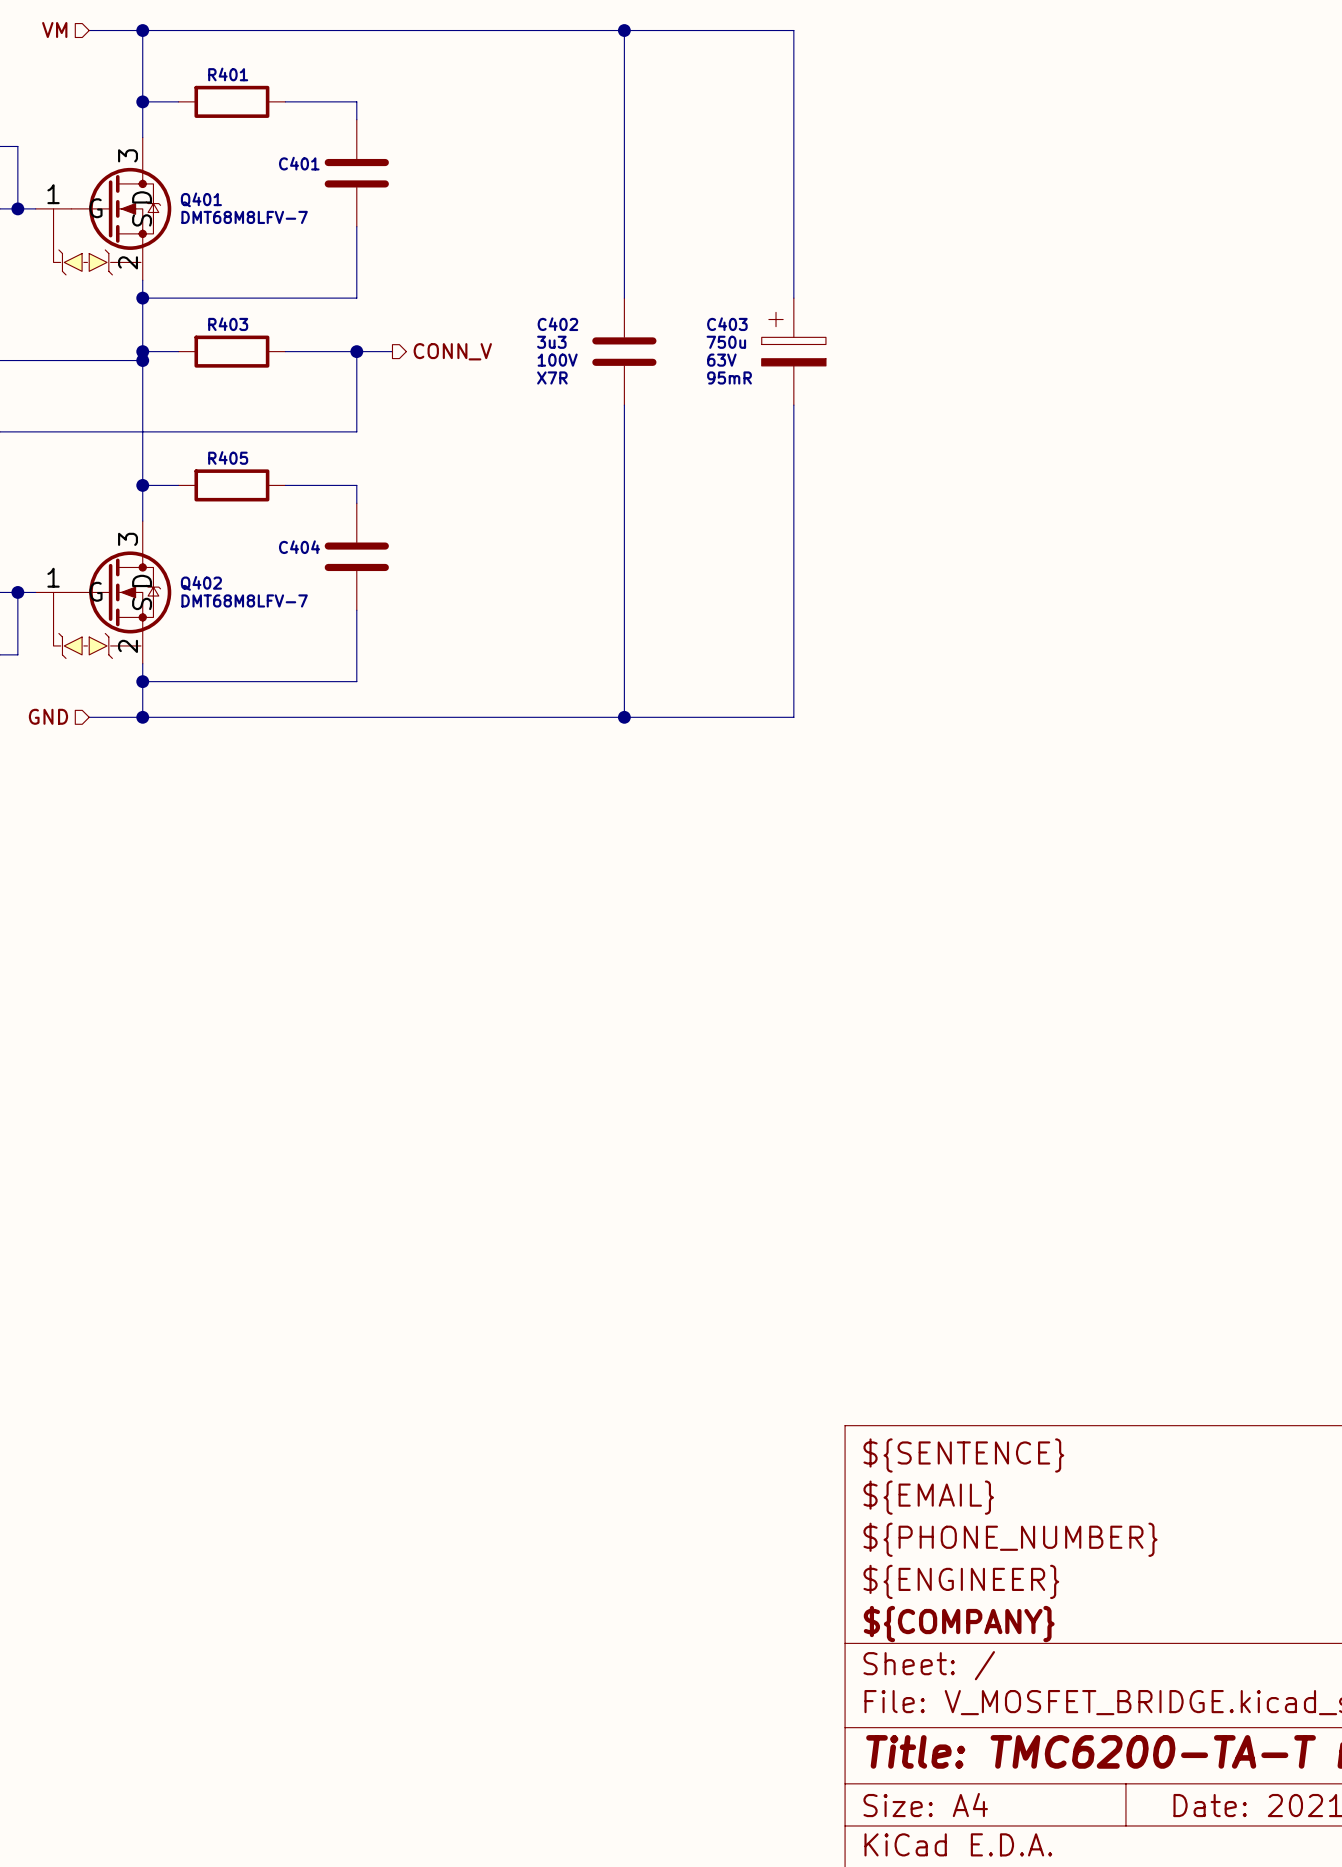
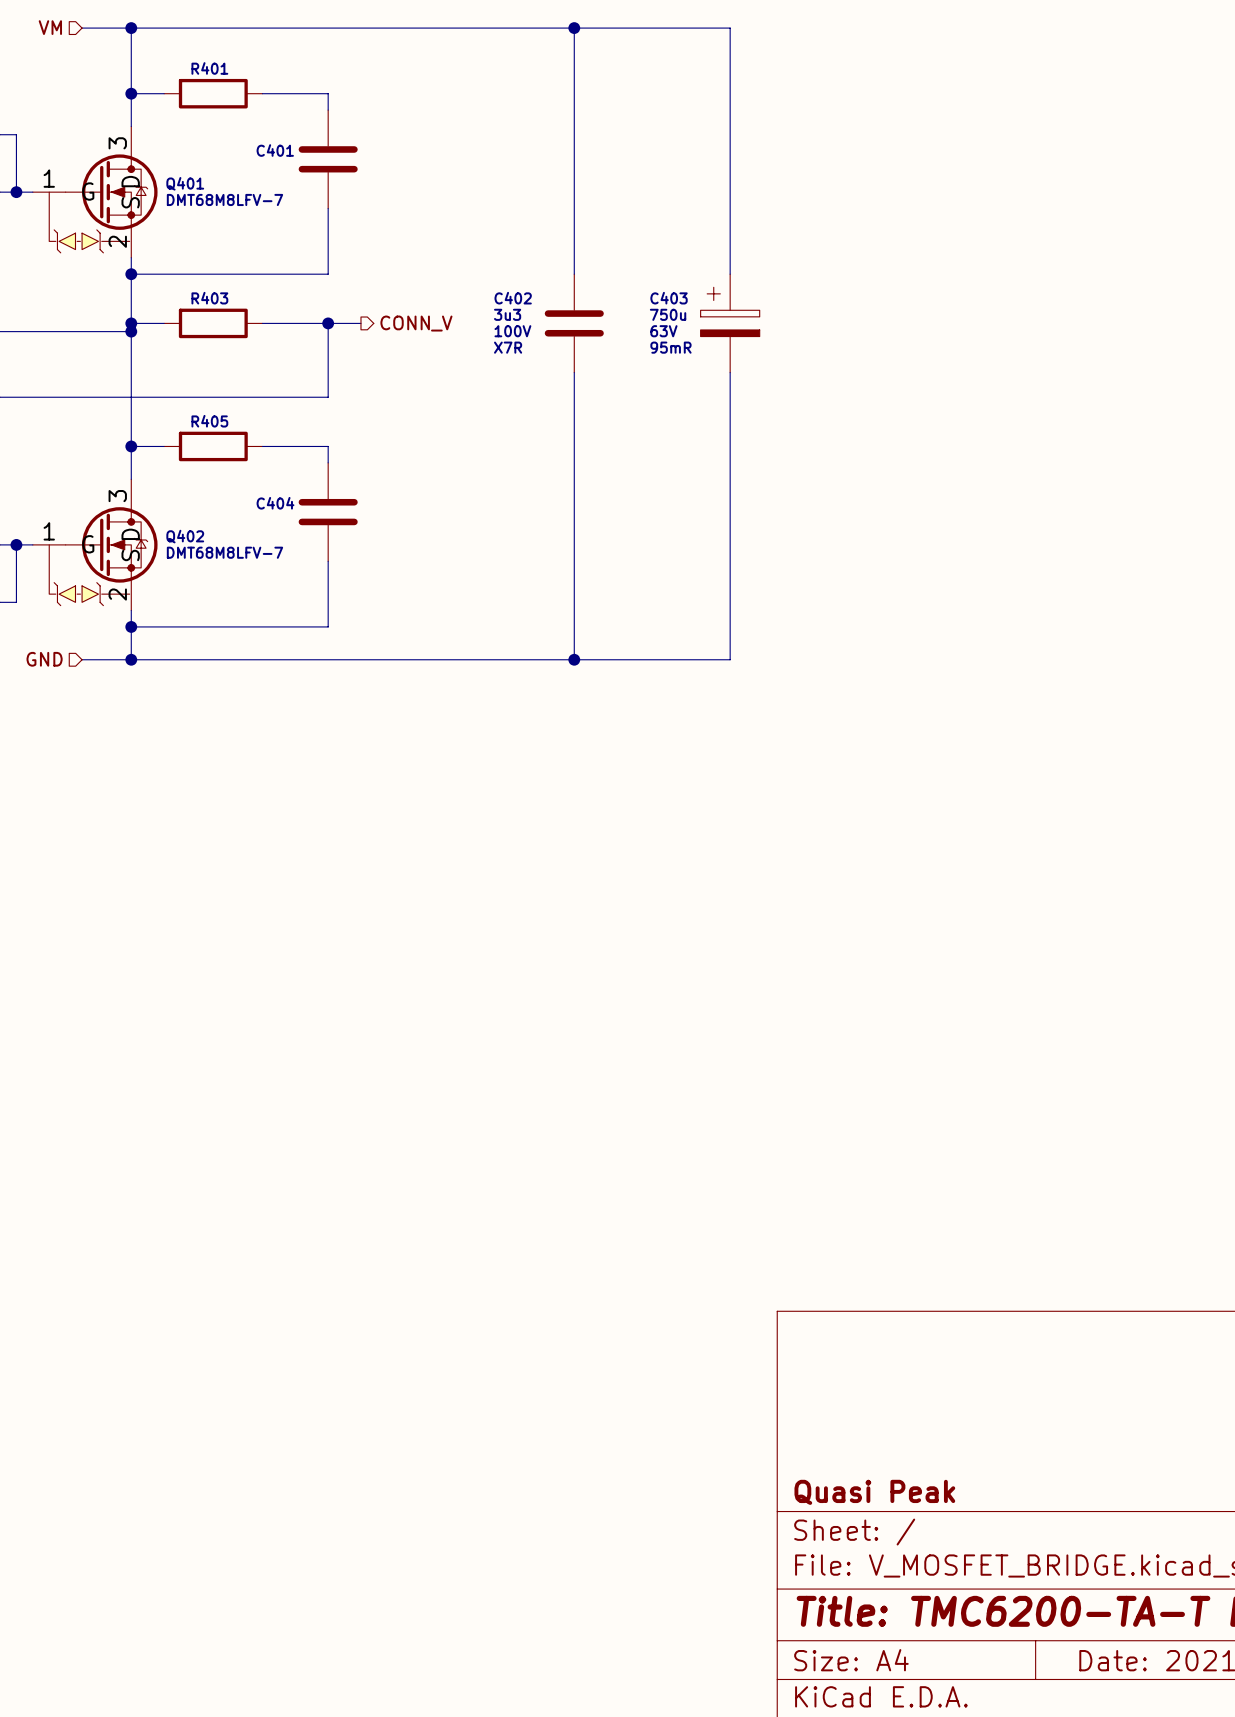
title block: ${SENTENCE} (963, 1455) -> none
title block: ${EMAIL} (928, 1497) -> none
title block: ${PHONE_NUMBER} (1010, 1539) -> none
title block: ${ENGINEER} (961, 1581) -> none
title block: ${COMPANY} (959, 1624) -> Quasi Peak (874, 1492)

